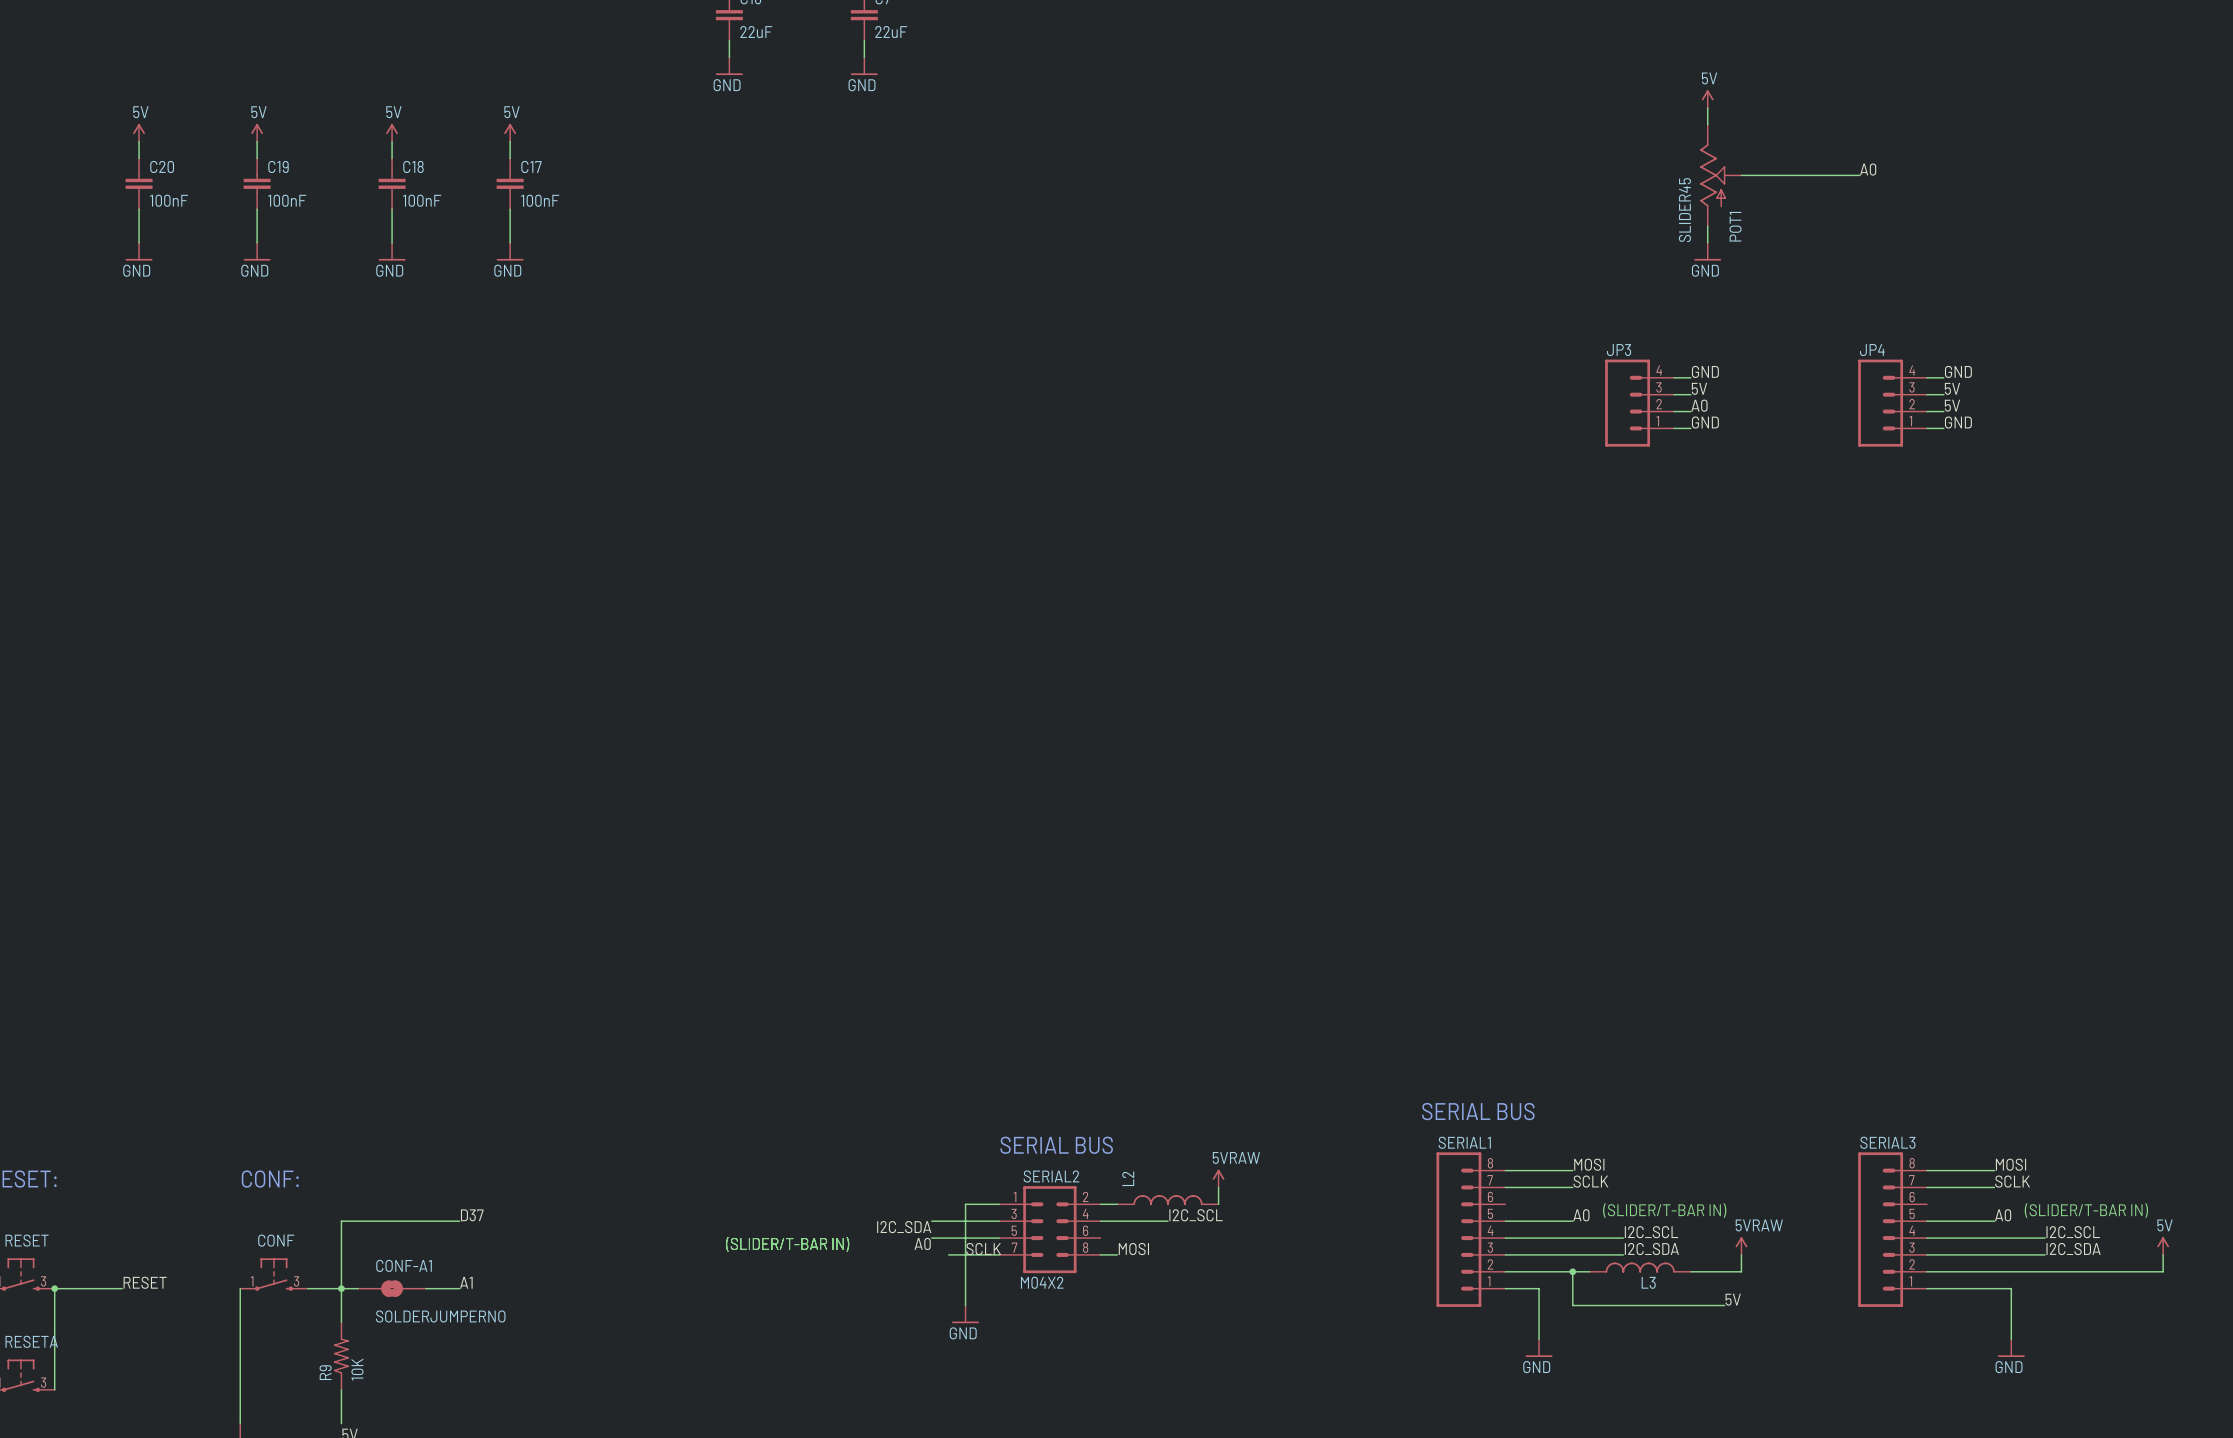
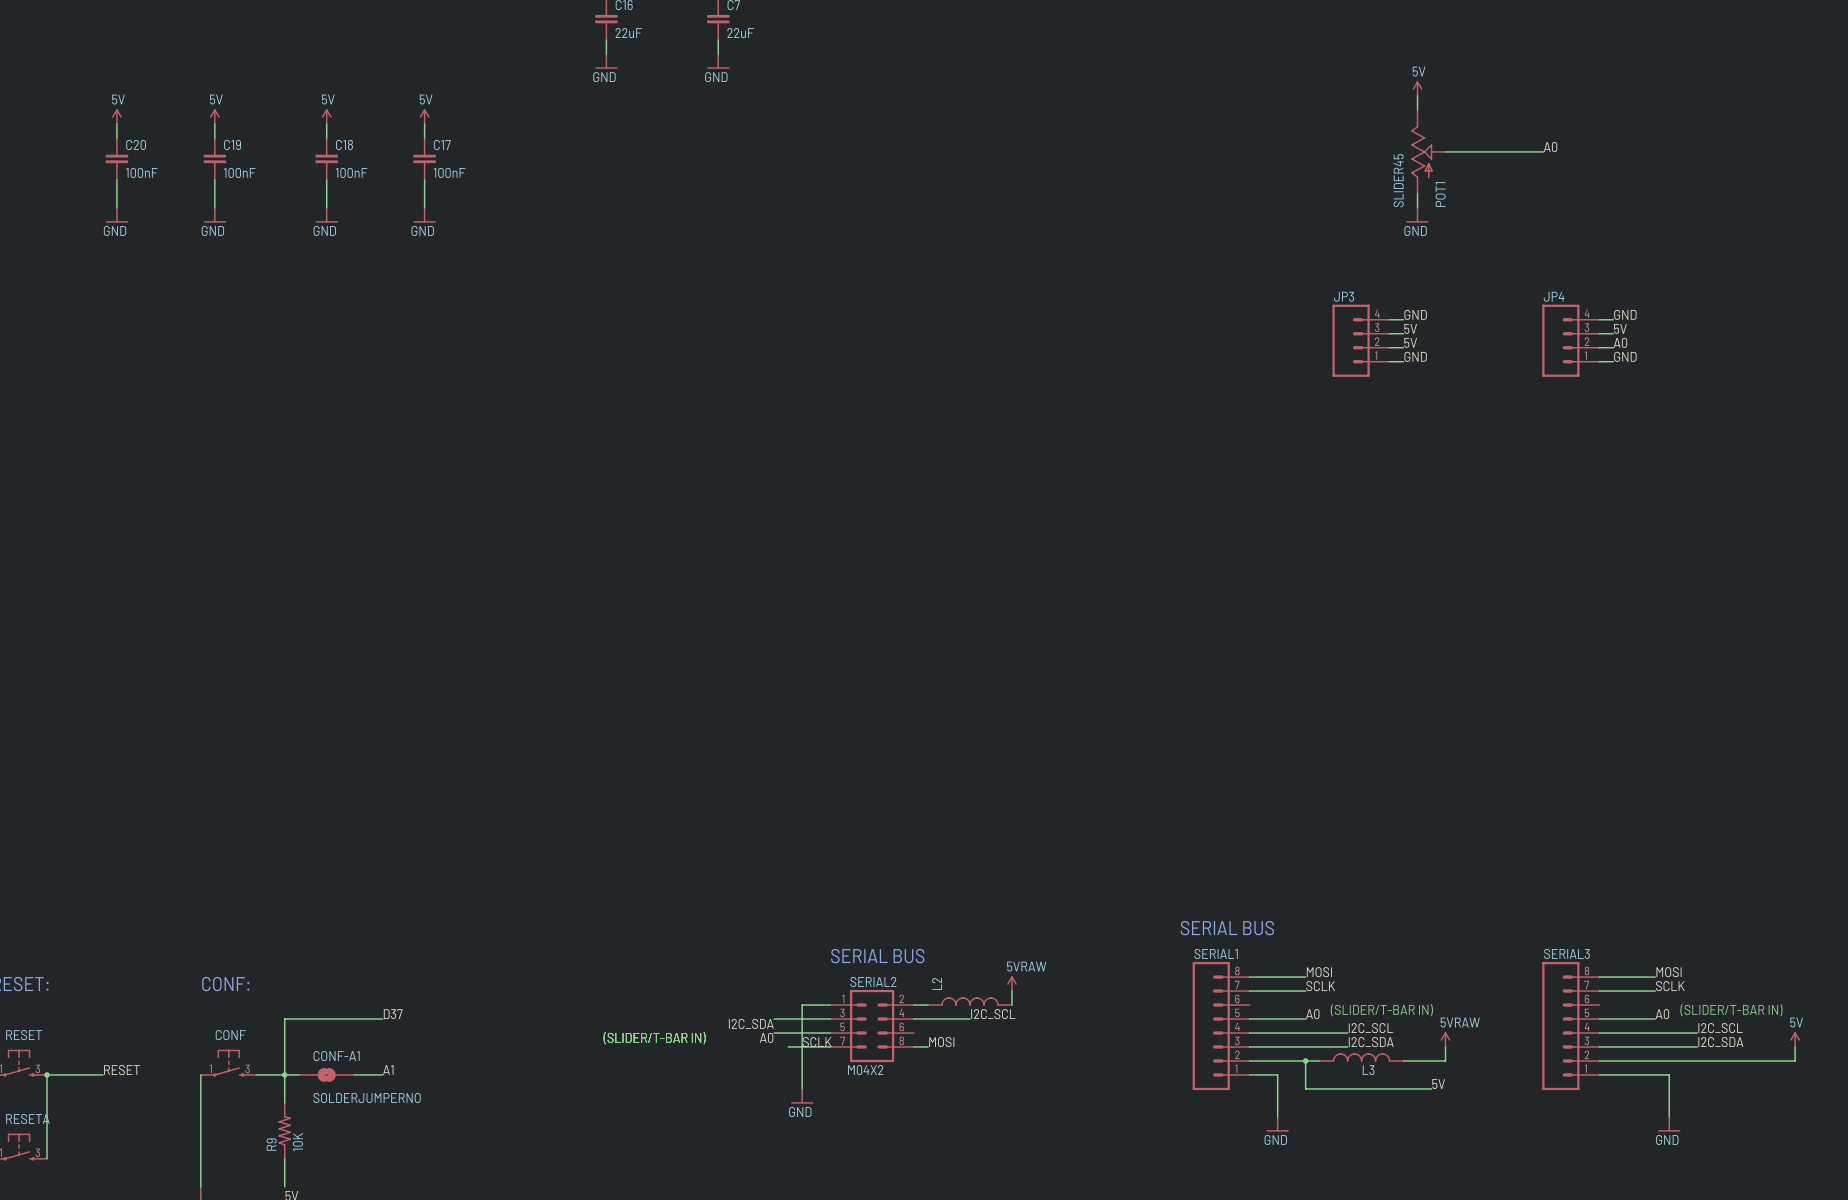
label: A0 (1699, 405) -> 5V (1410, 342)
label: 5V (1952, 405) -> A0 (1620, 342)

